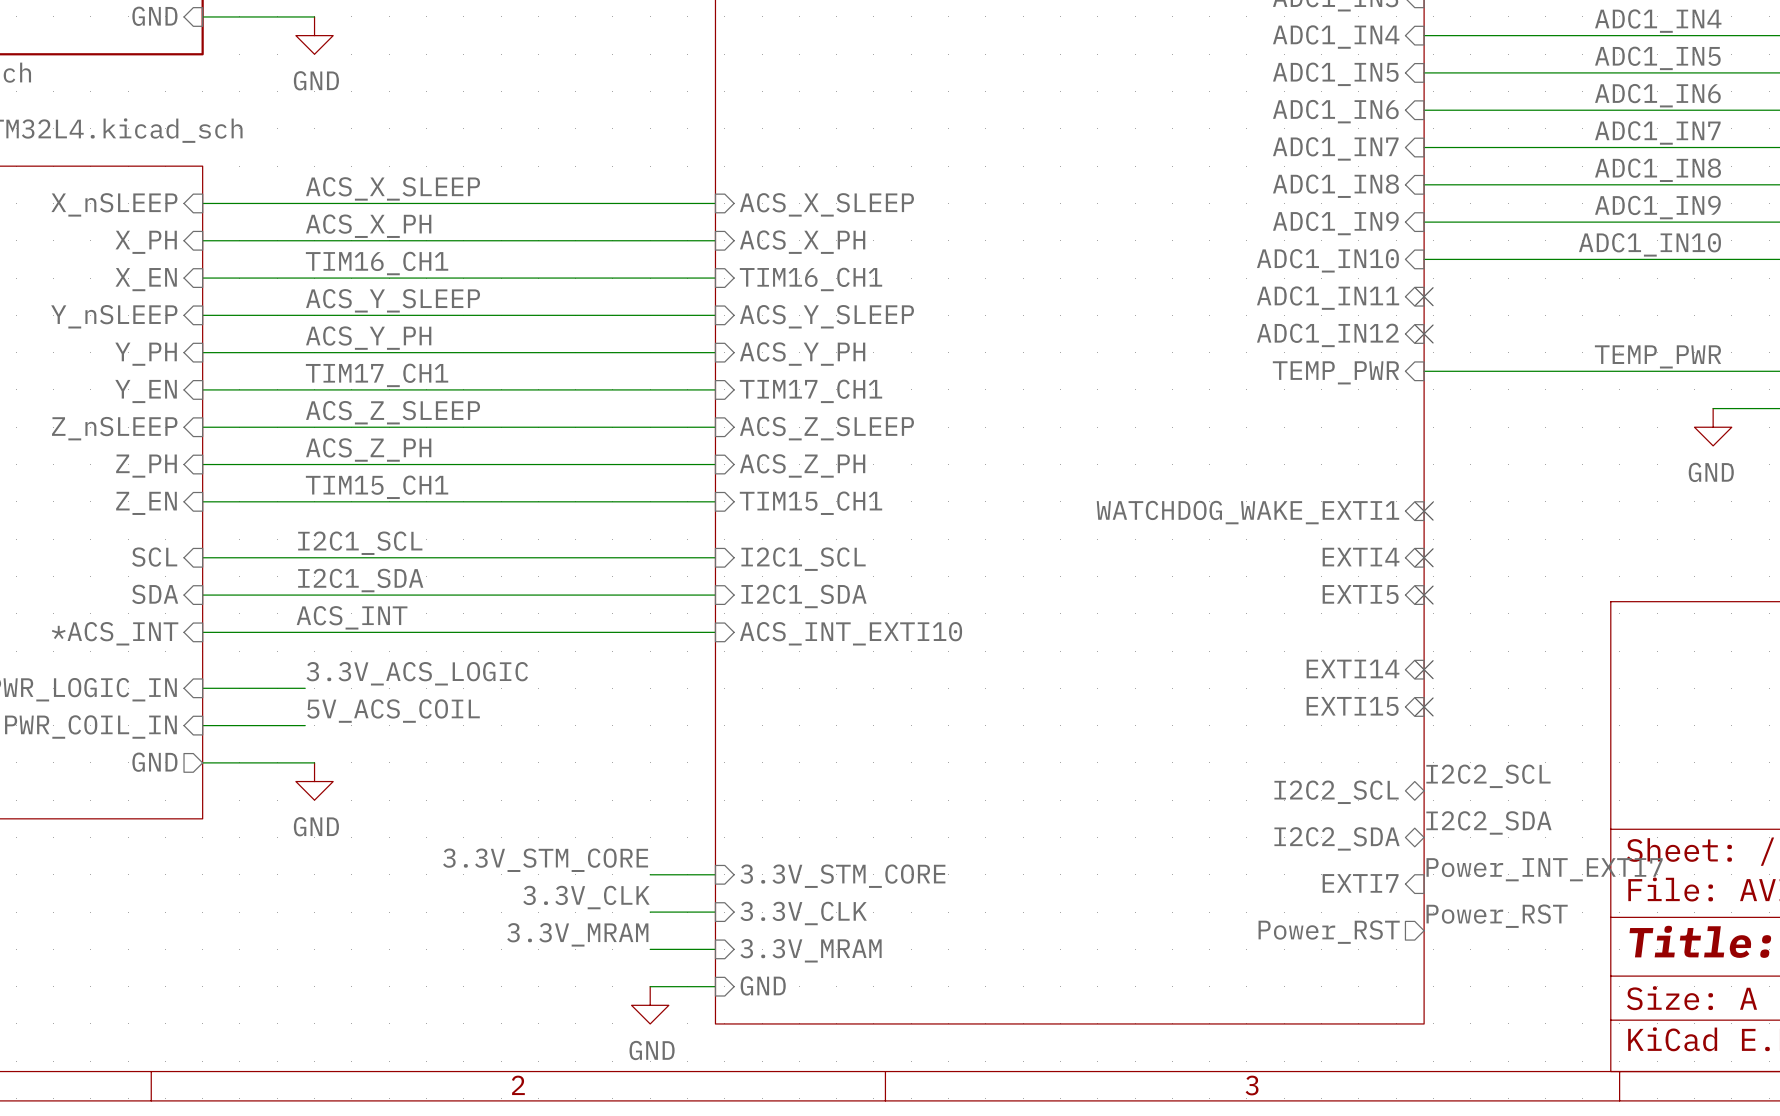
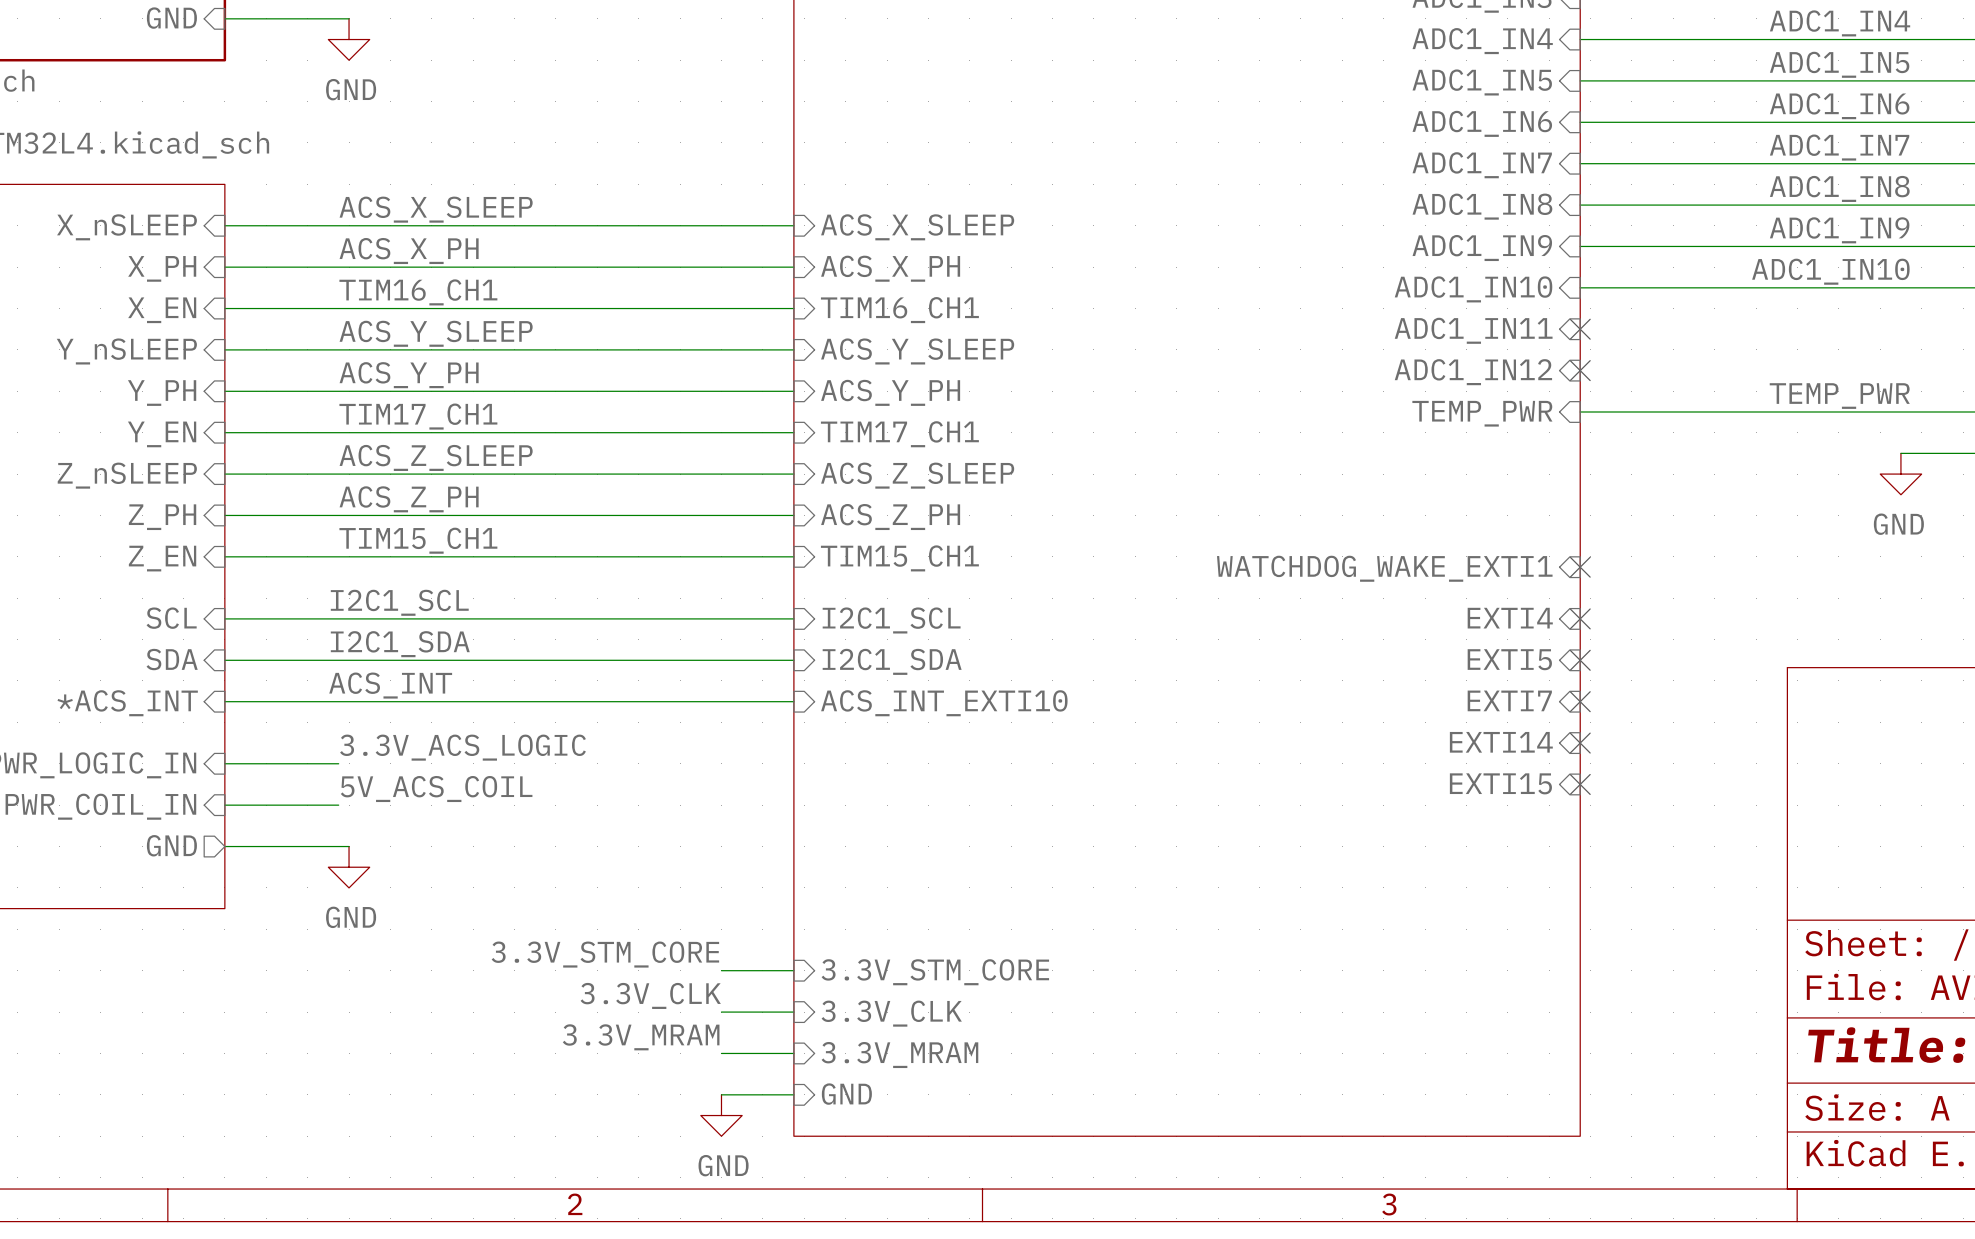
no-connect mark: none -> (1580, 701)
label: I2C2_SCL (1488, 776) -> none
sheet pin: I2C2_SCL (1336, 792) -> none
label: I2C2_SDA (1488, 822) -> none
sheet pin: I2C2_SDA (1337, 838) -> none
label: Power_INT_EXTI7 (1544, 869) -> none
sheet pin position: EXTI7 (1360, 883) -> EXTI7 (1509, 700)
label: Power_RST (1497, 916) -> none
sheet pin: Power_RST (1329, 932) -> none

